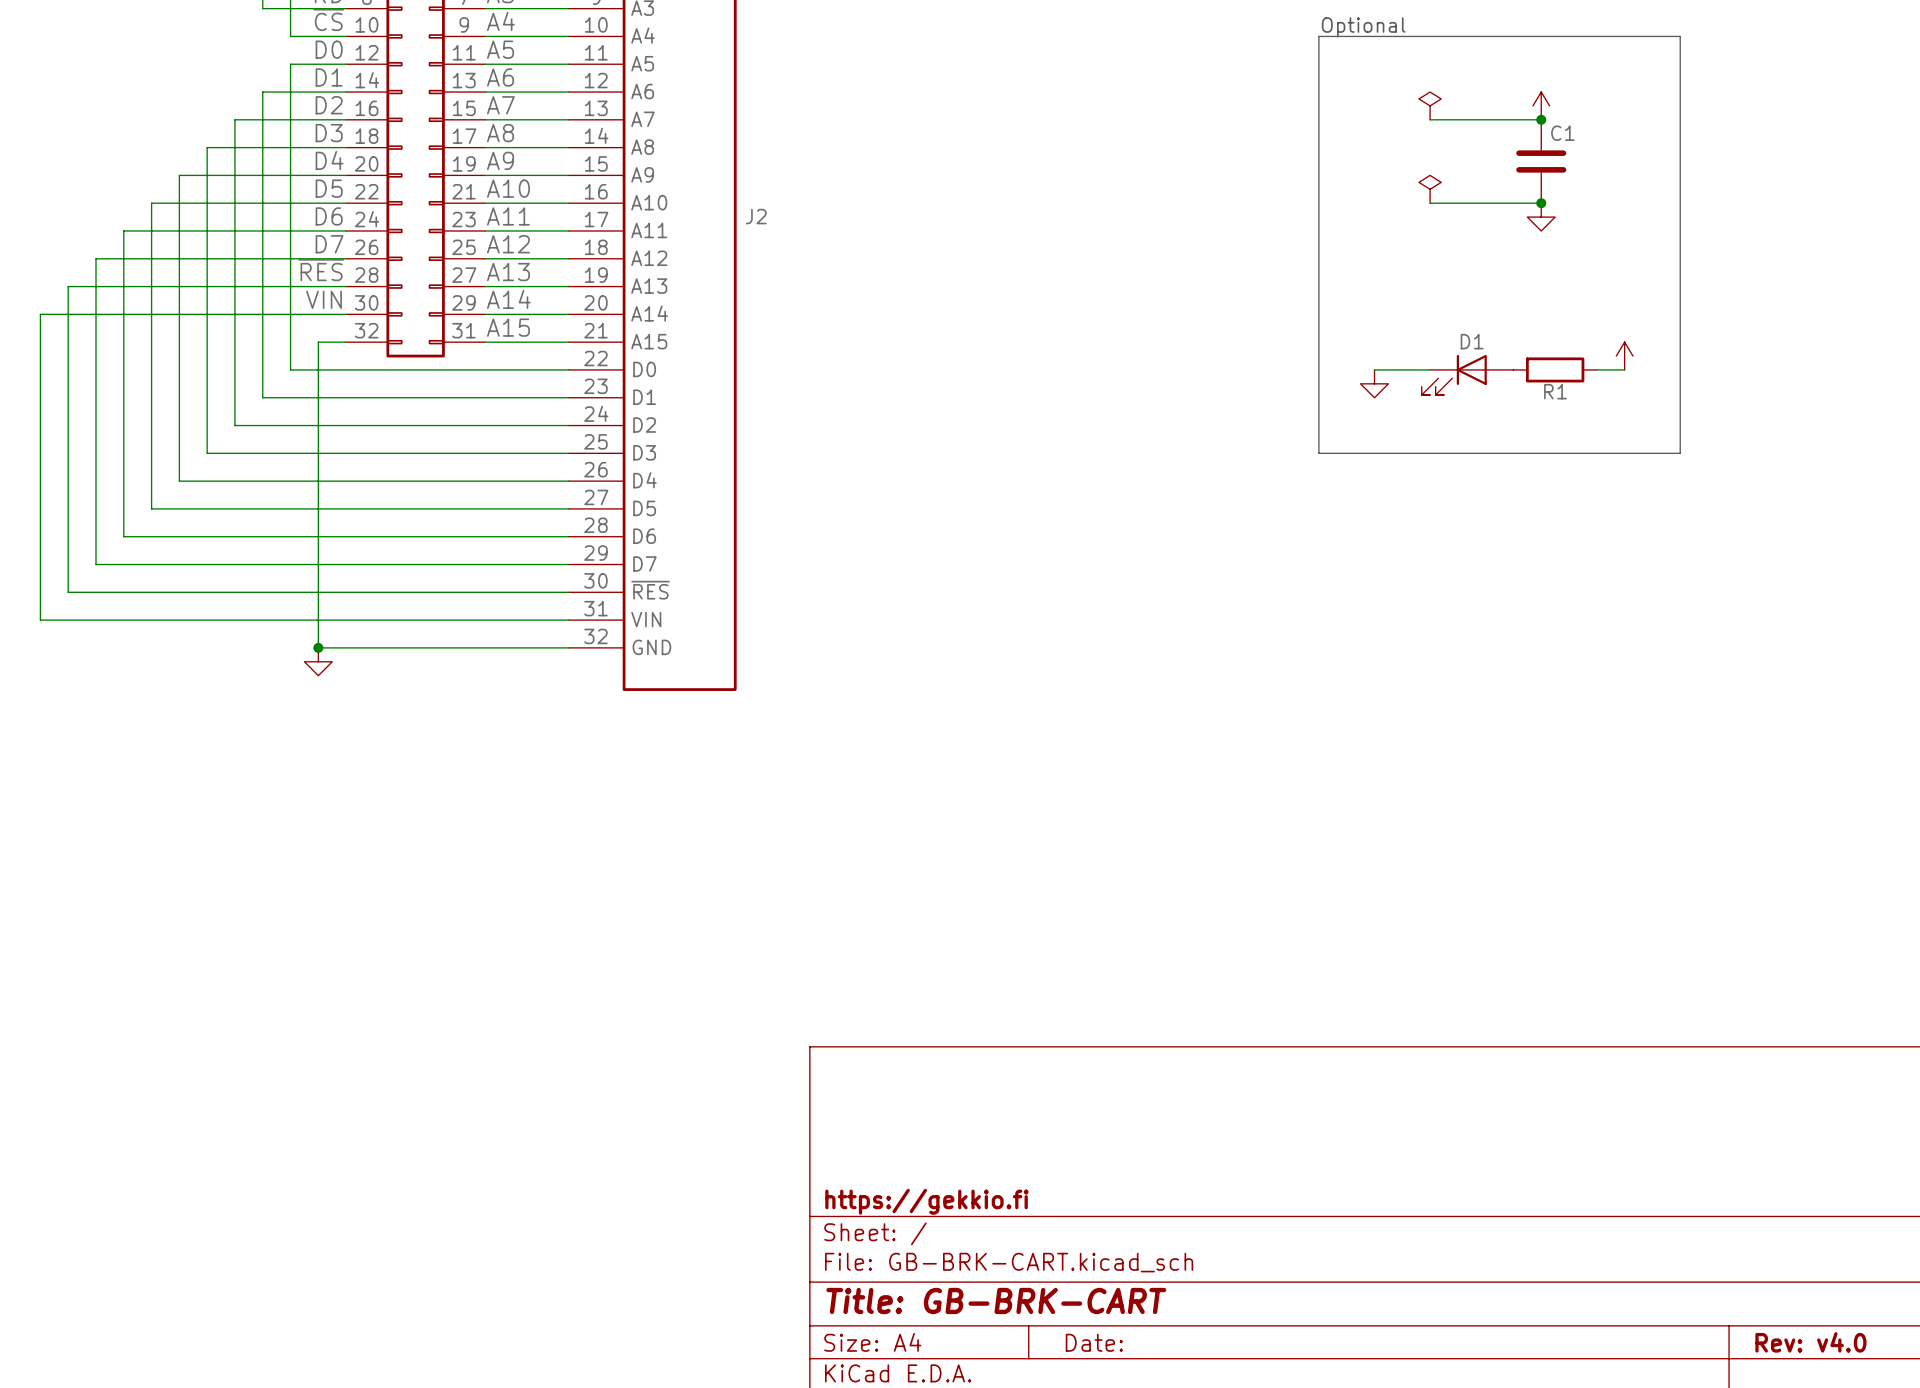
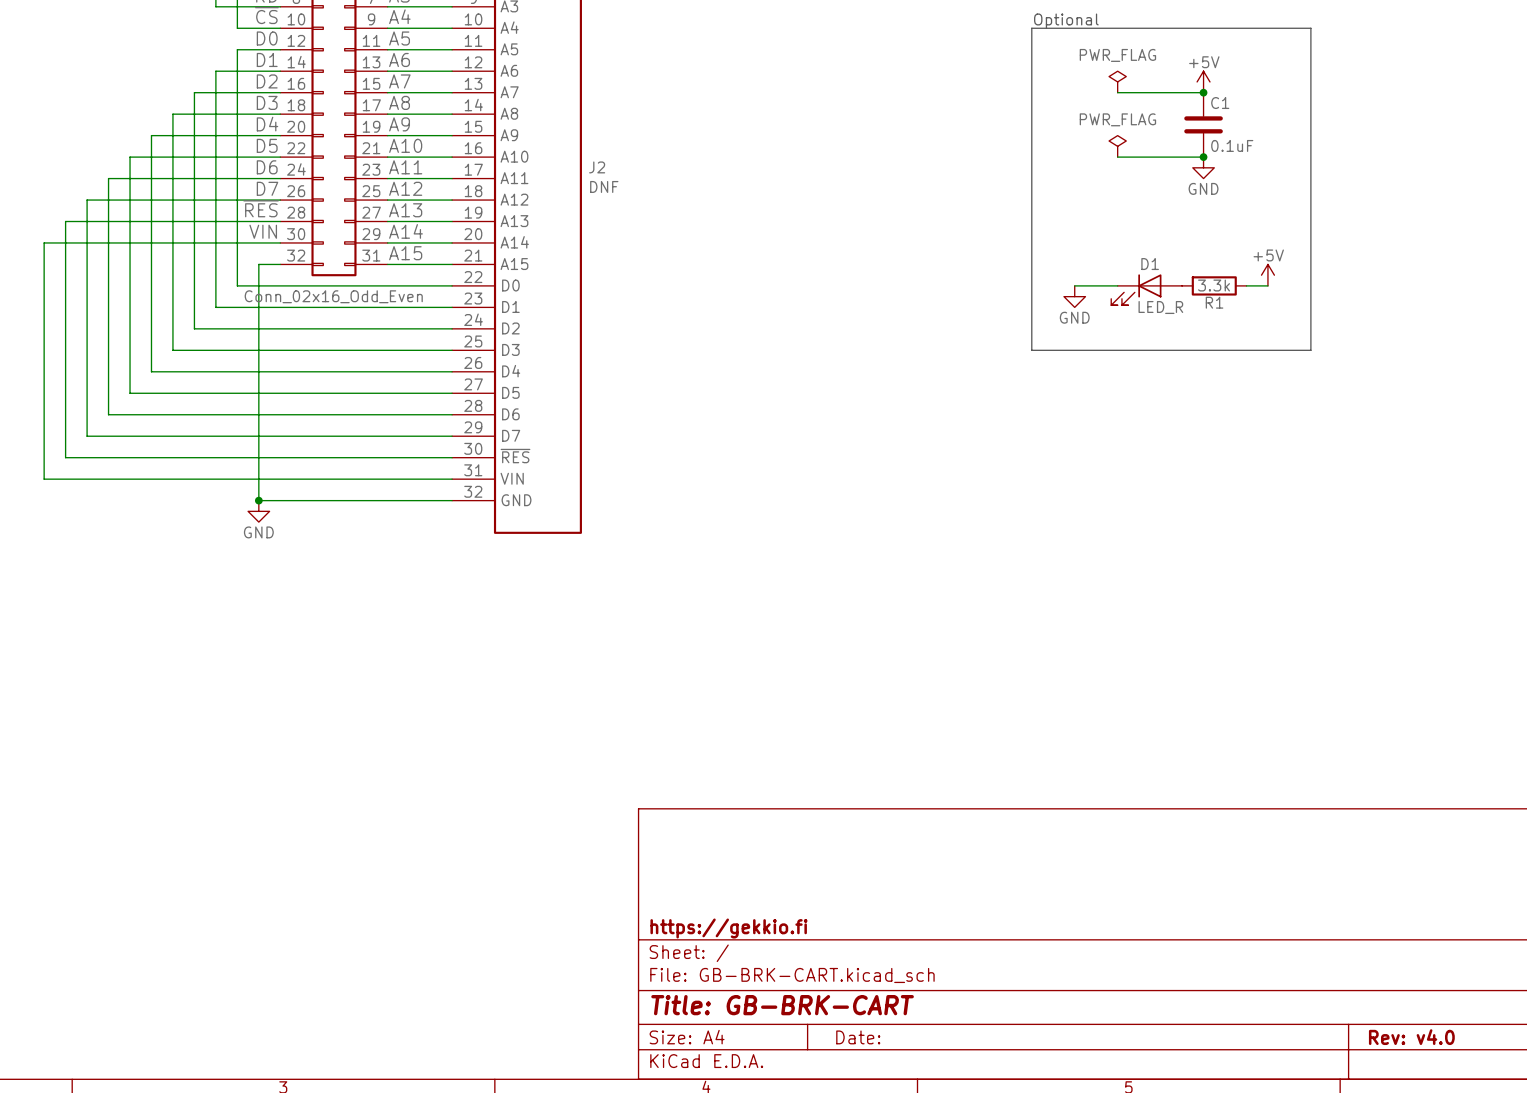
power symbol text: none -> PWR_FLAG (1117, 55)
power symbol text: none -> +5V (1204, 62)
power symbol text: none -> PWR_FLAG (1117, 119)
C1 value: none -> 0.1uF (1232, 145)
J2 value: none -> DNF (604, 186)
power symbol text: none -> GND (1203, 188)
power symbol text: none -> +5V (1268, 255)
R1 value: none -> 3.3k (1214, 285)
part value: none -> Conn_02x16_Odd_Even (333, 296)
D1 value: none -> LED_R (1160, 307)
power symbol text: none -> GND (1074, 317)
power symbol text: none -> GND (258, 532)

